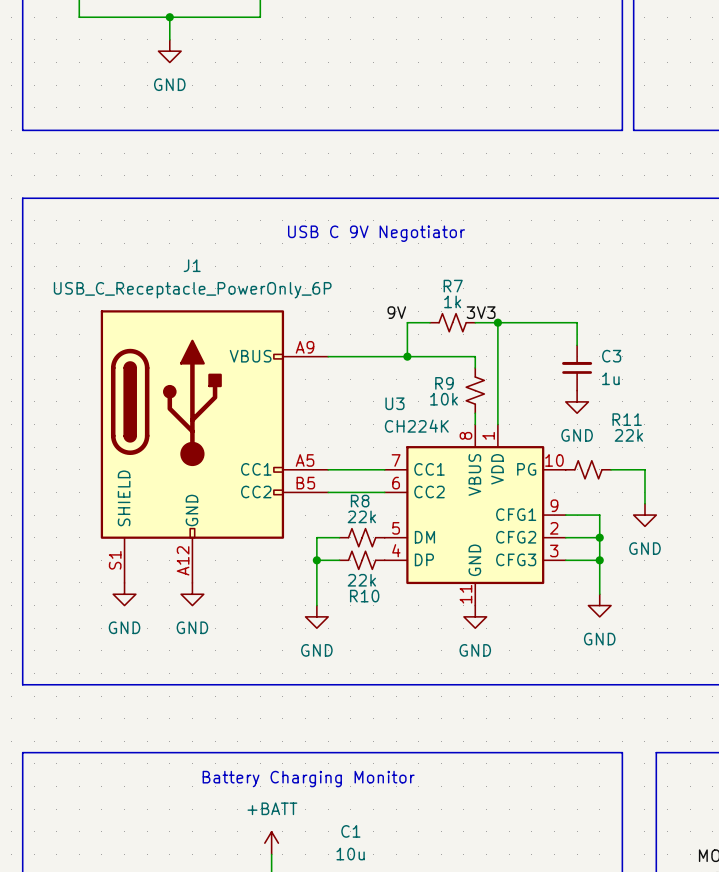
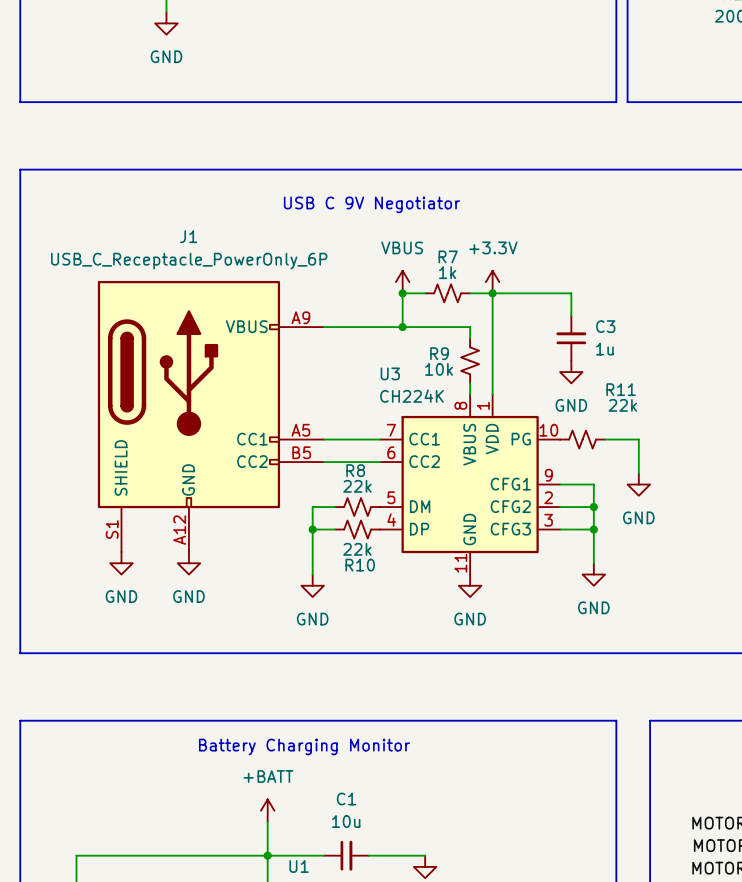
power symbol: none -> VBUS (402, 282)
power symbol: none -> +3.3V (492, 282)
label: 9V (396, 312) -> none
label: 3V3 (481, 312) -> none
junction: none -> (402, 293)

